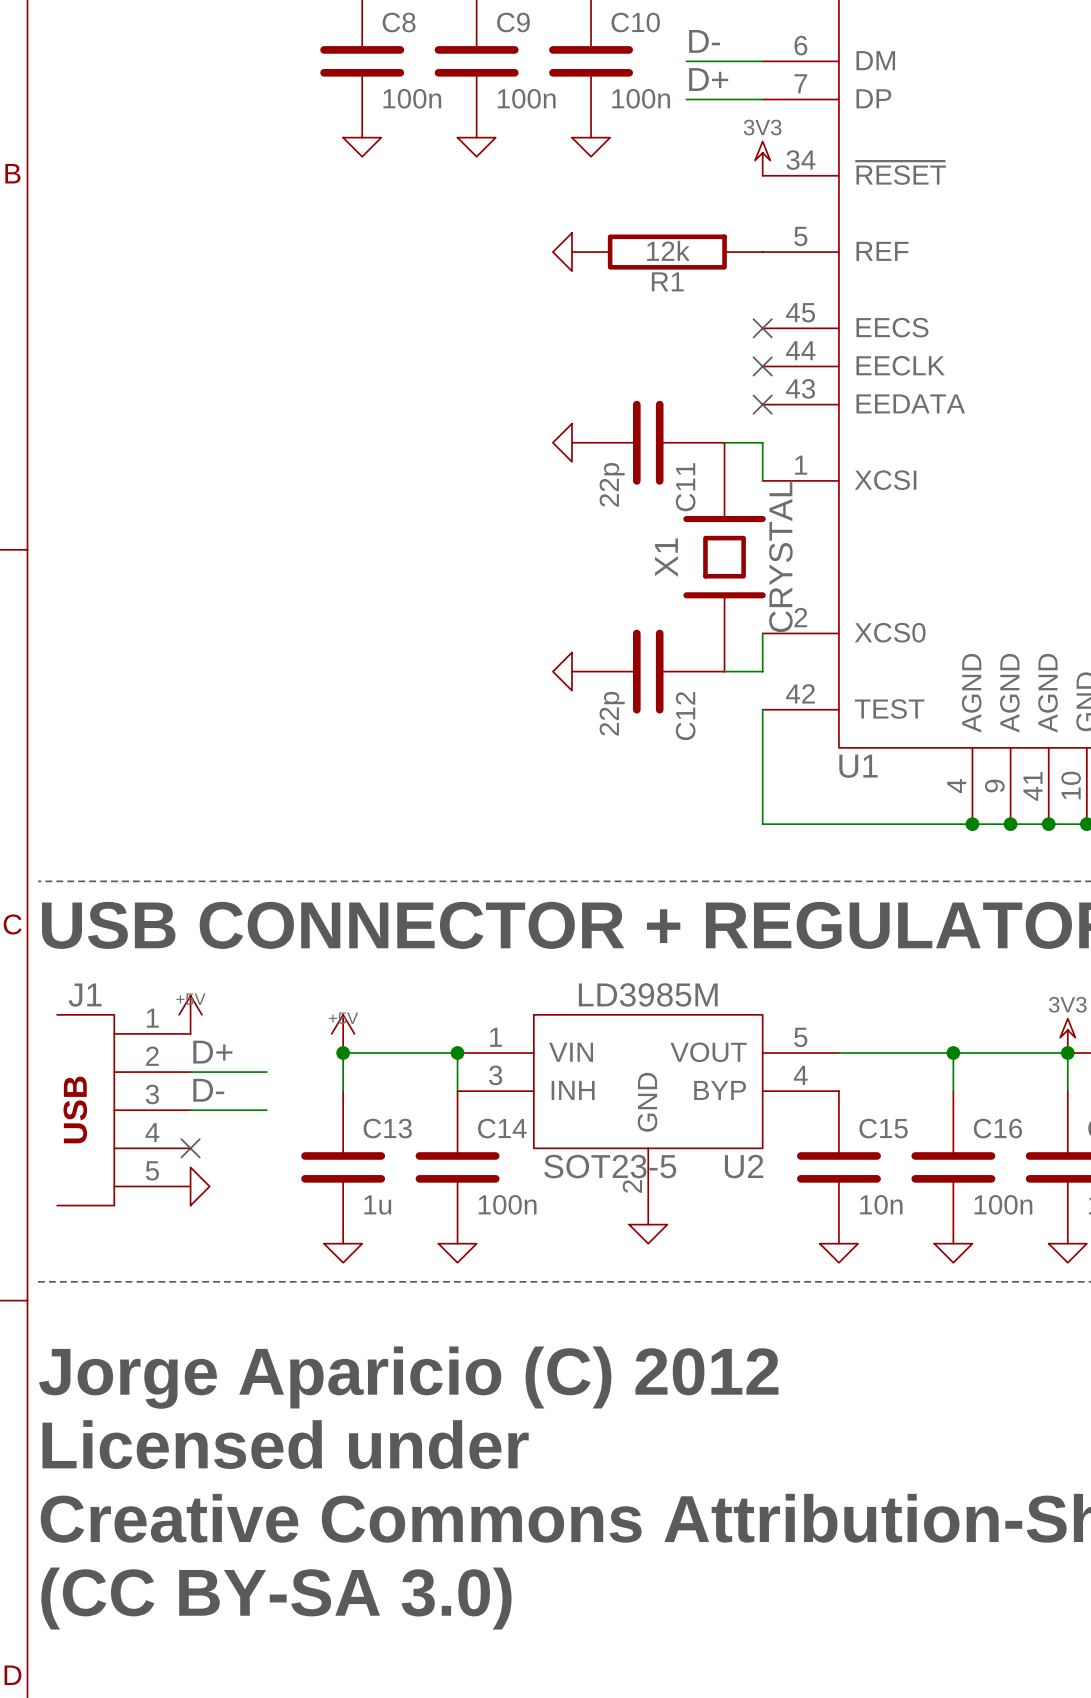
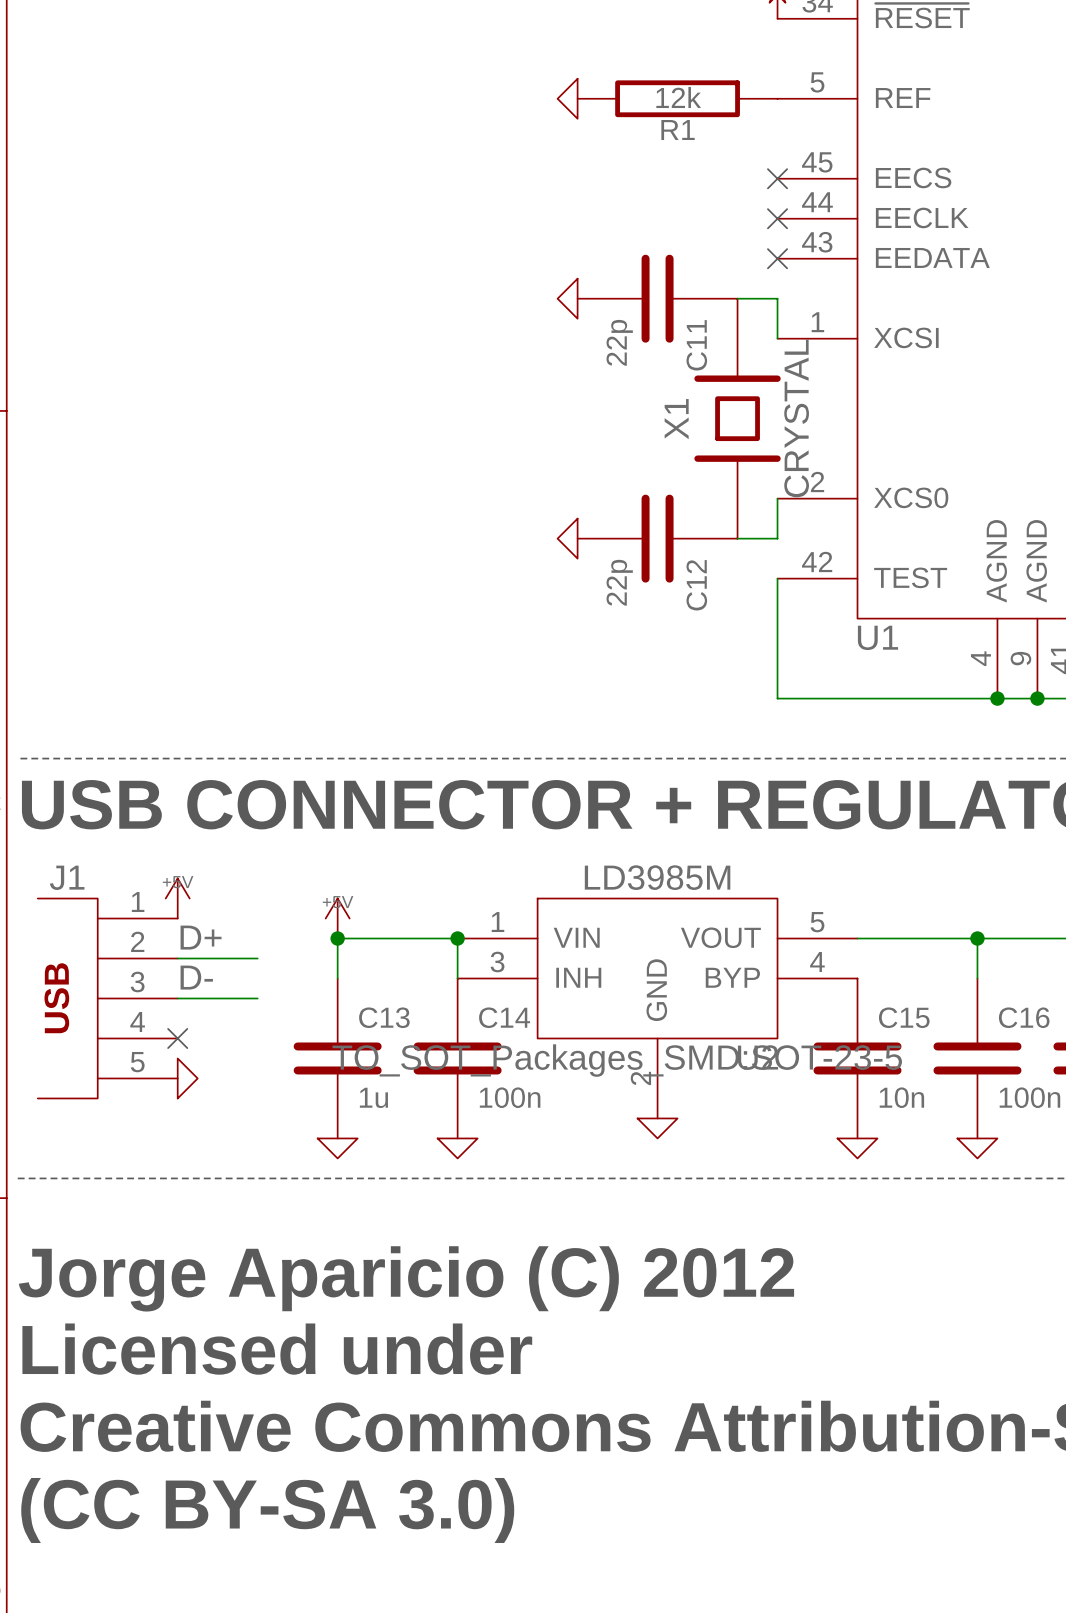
U2 text: SOT23-5 (610, 1166) -> TO_SOT_Packages_SMD:SOT-23-5 (617, 1060)

